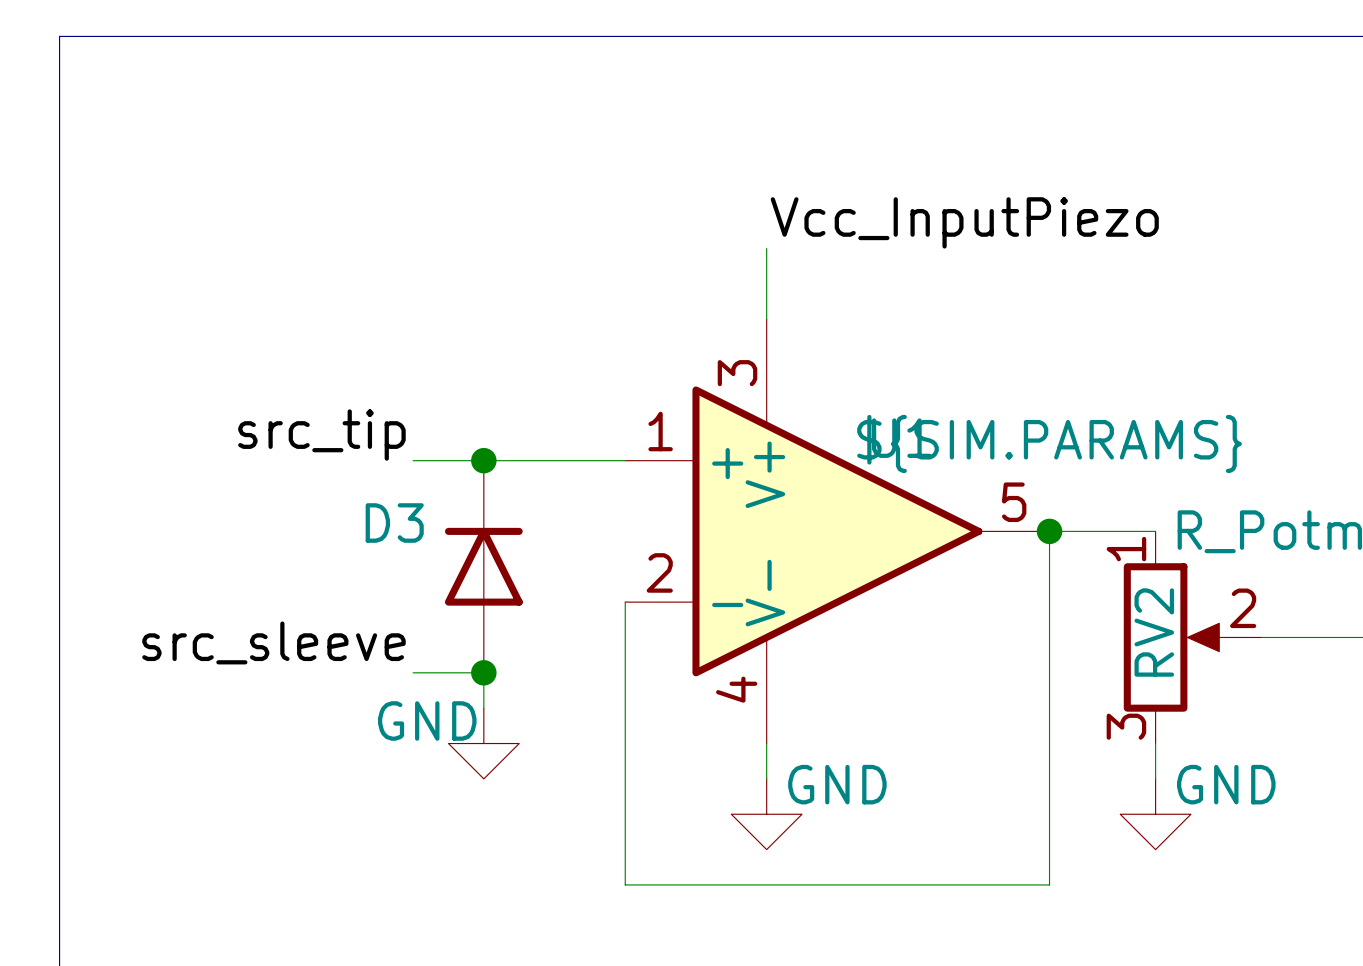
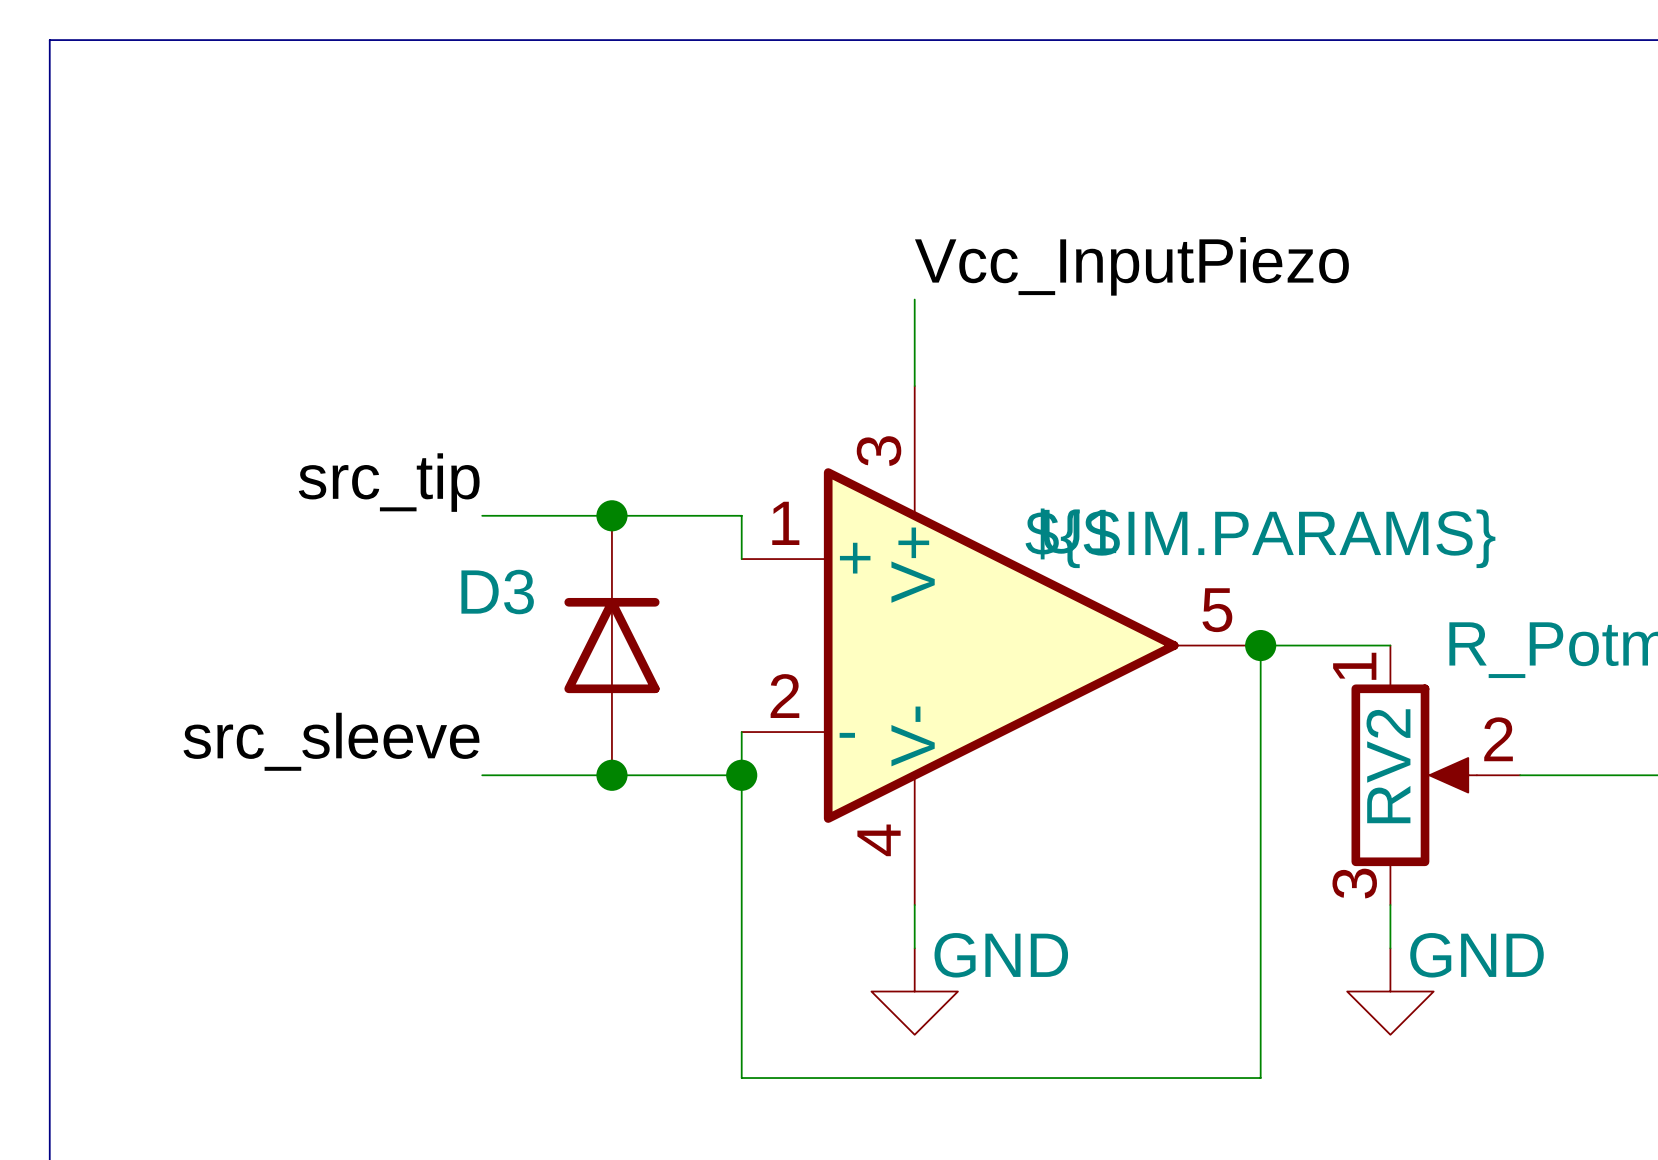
label position: src_tip (321, 435) -> src_tip (389, 482)
wire: (413, 460) (625, 460) -> (482, 515) (741, 515) (741, 559)
junction position: (483, 460) -> (611, 515)
D3 position: (483, 566) -> (611, 645)
wire: none -> (482, 775) (741, 775)
junction: none -> (741, 775)
label position: src_sleeve (273, 642) -> src_sleeve (331, 741)
wire: (413, 672) (483, 672) (483, 708) -> none
junction position: (483, 672) -> (611, 775)
power symbol: GND (483, 743) -> none

